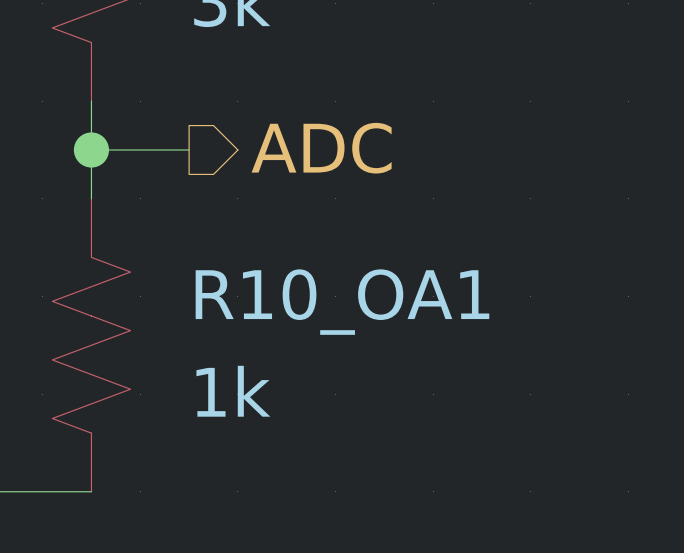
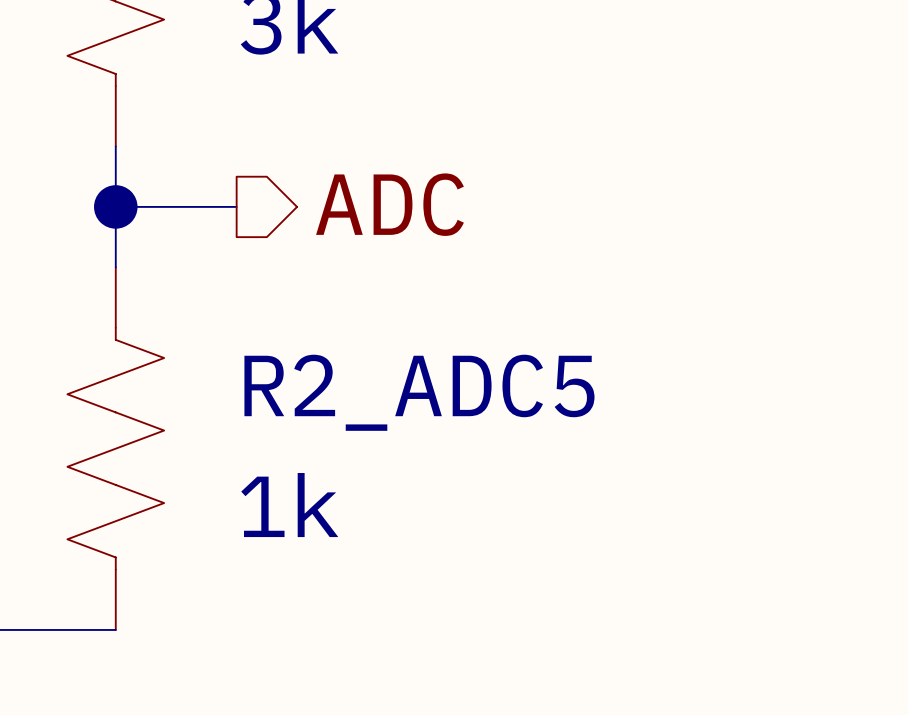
R10_OA1 name: R10_OA1 (342, 302) -> R2_ADC5 (419, 392)

